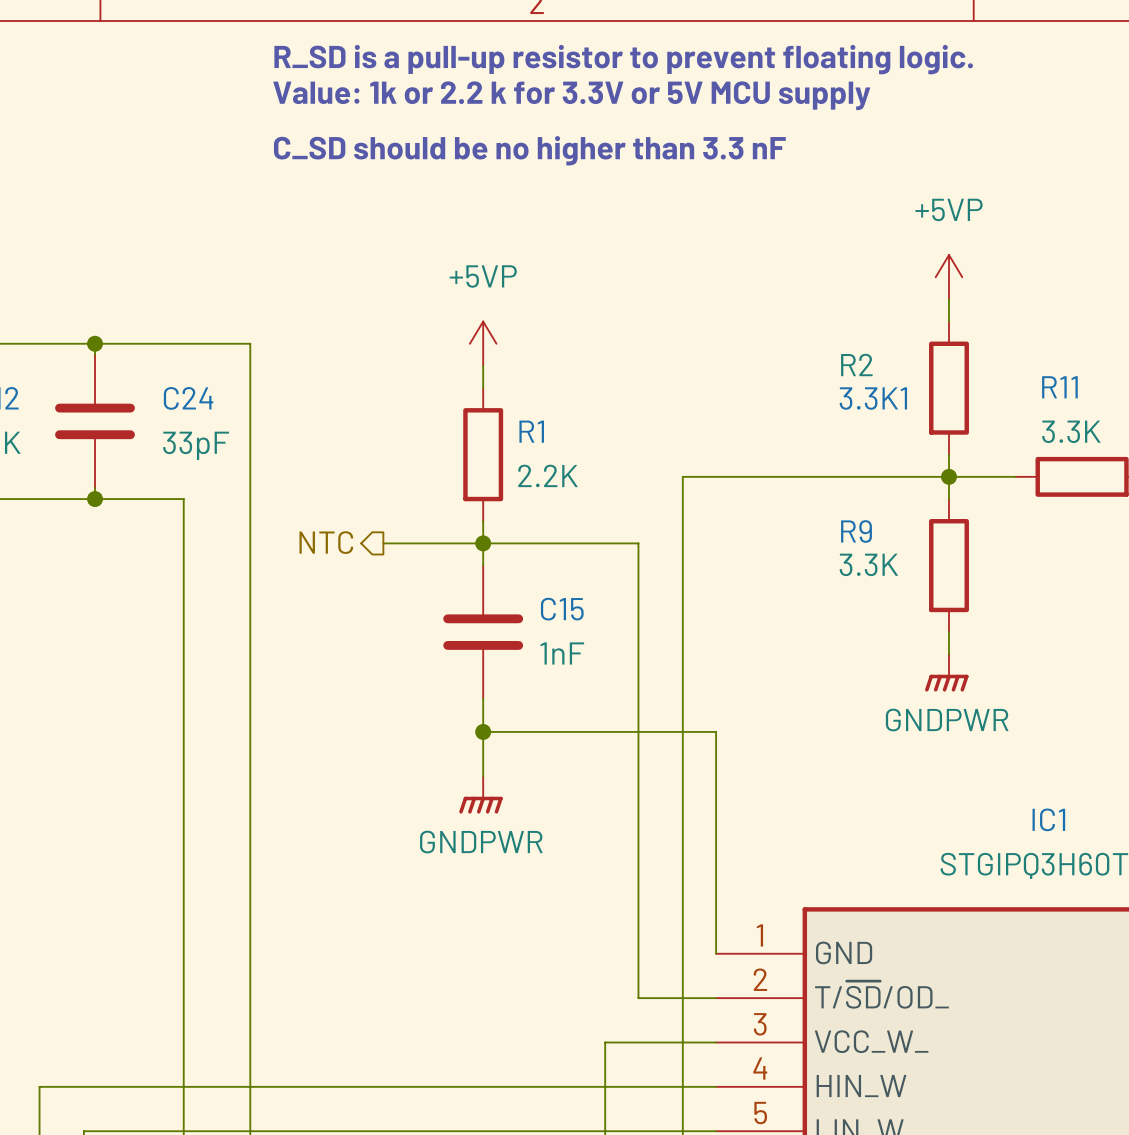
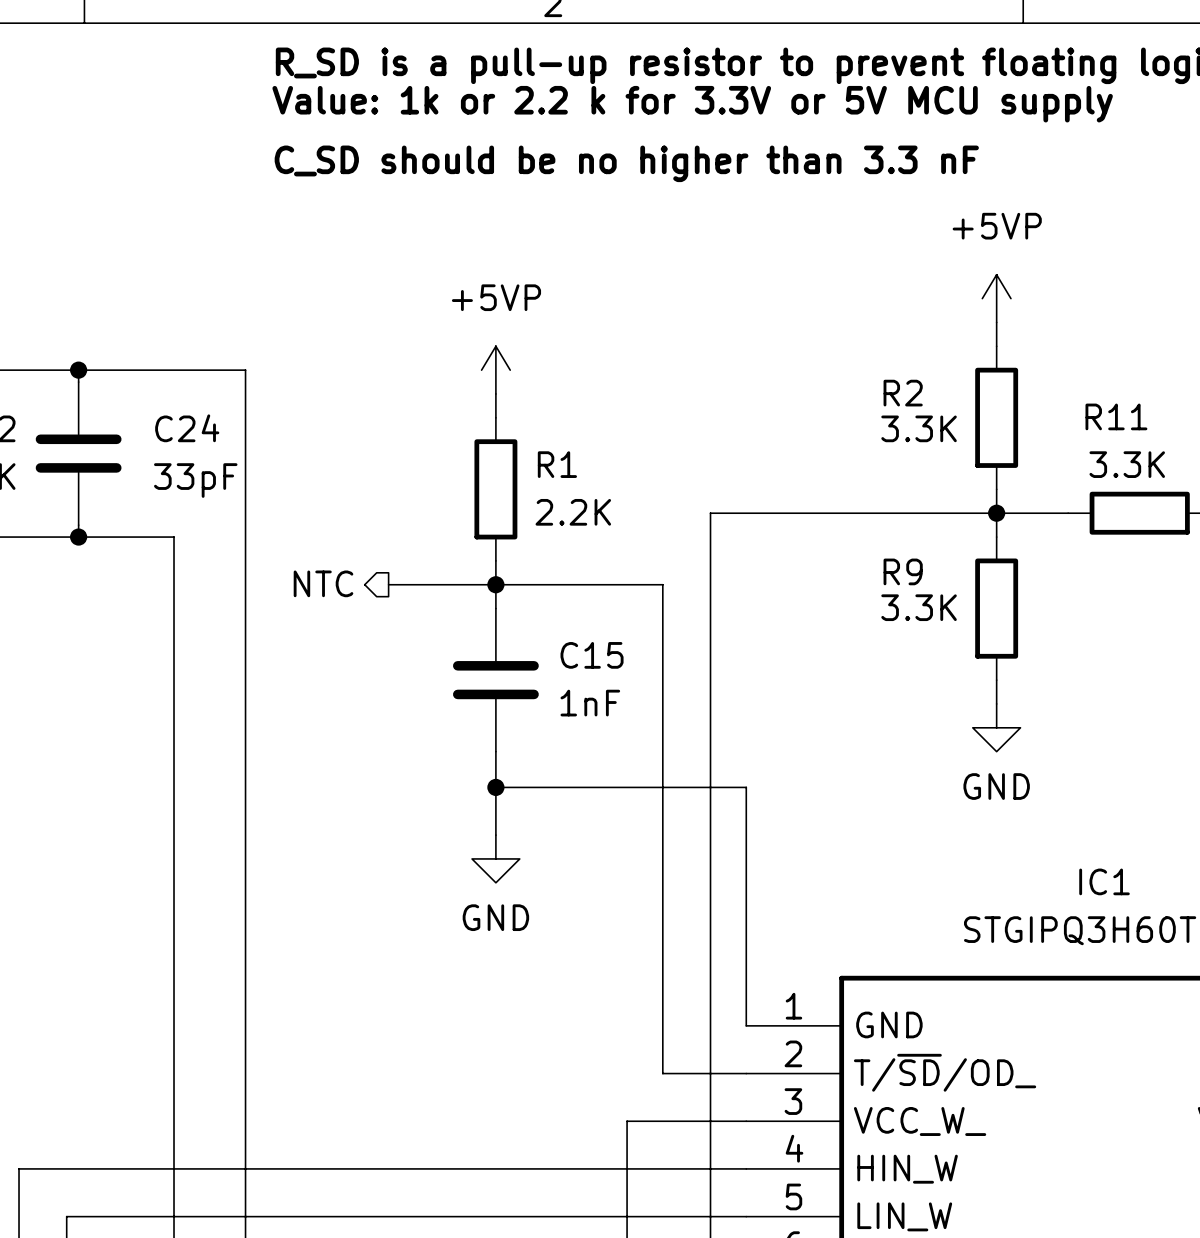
3.3K1 name: 3.3K1 (873, 398) -> 3.3K (919, 428)
power symbol: GNDPWR (946, 672) -> GND (996, 727)
power symbol: GNDPWR (480, 794) -> GND (495, 858)

